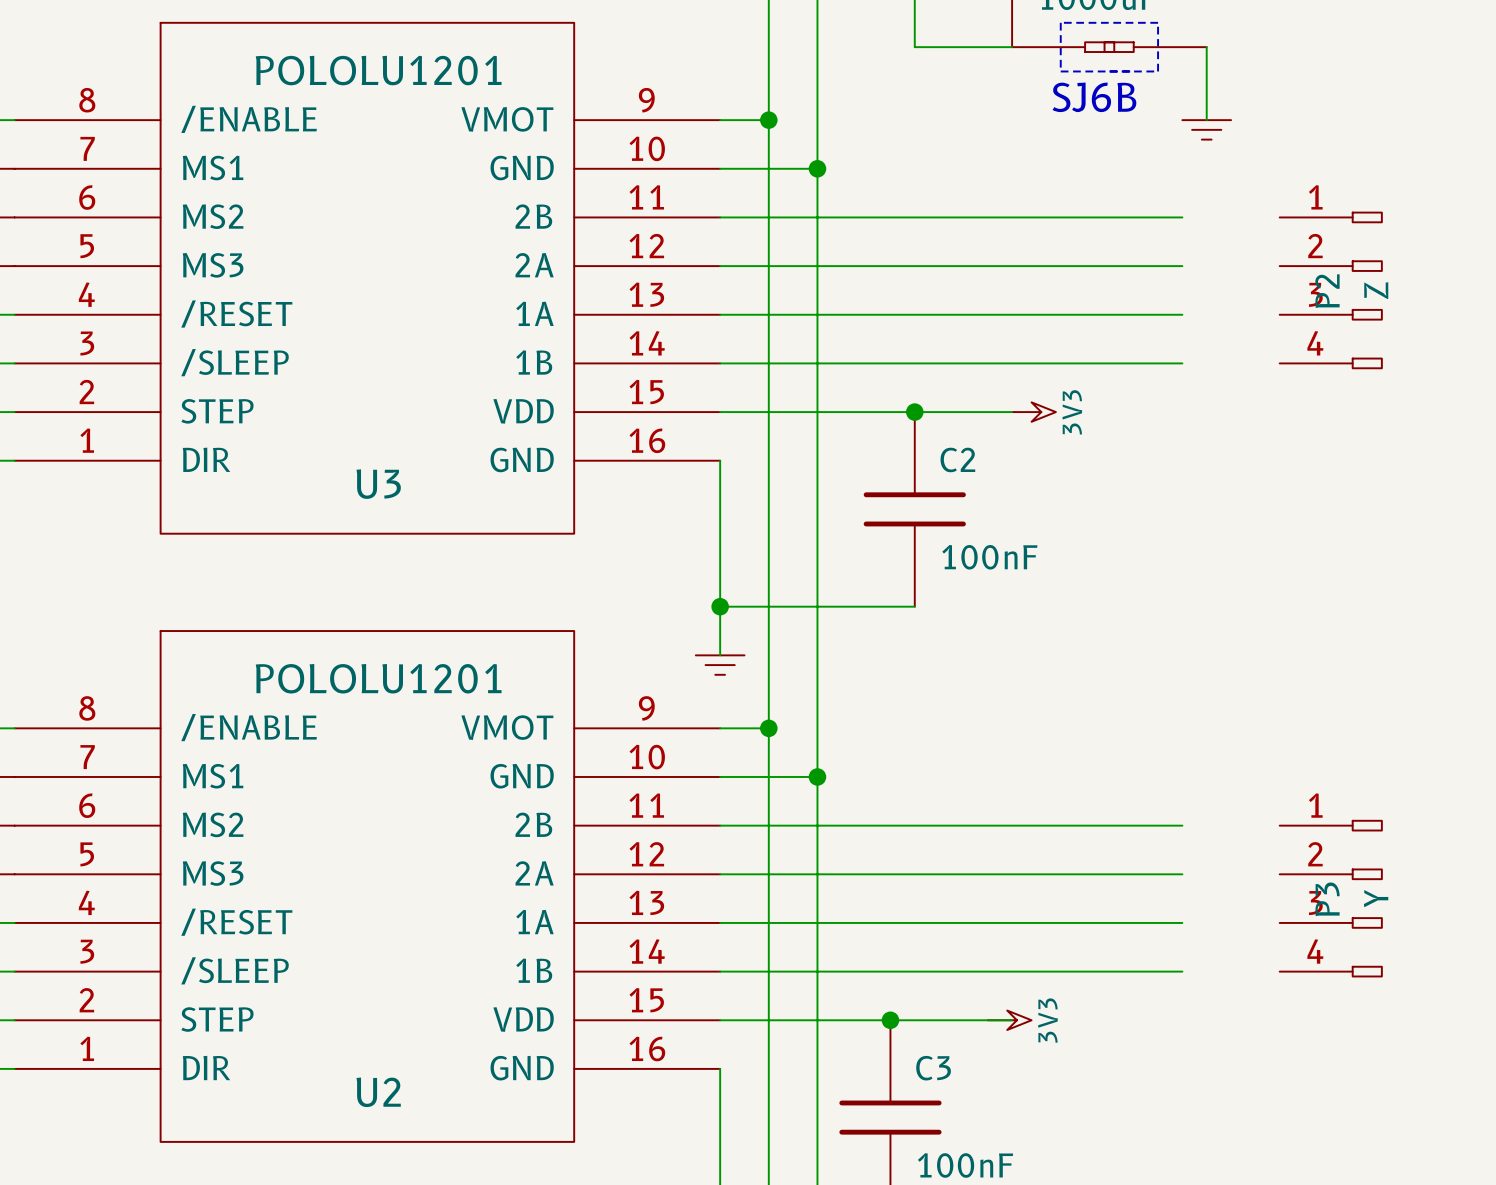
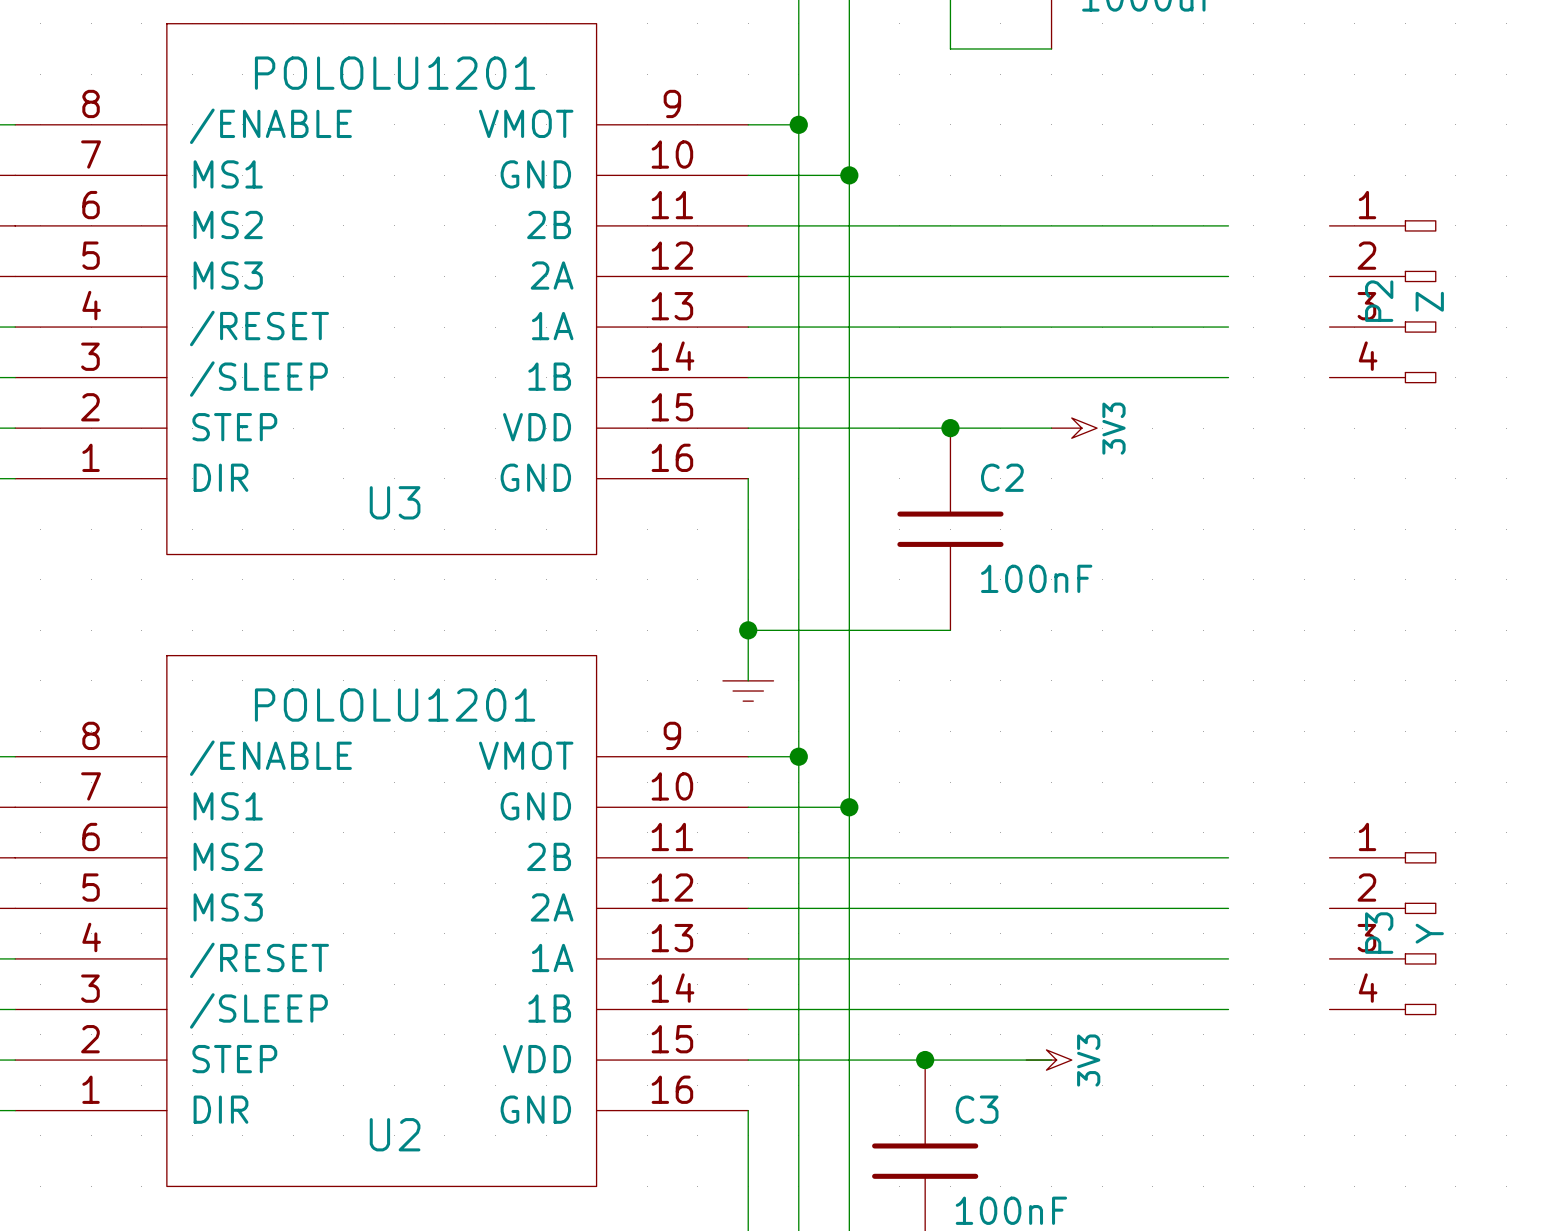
line: (1060, 22) (1158, 22) (1158, 71) (1060, 71) (1060, 22) -> none
part: (1063, 47) -> none
part: (1155, 47) -> none
wire: (1206, 47) (1206, 120) -> none
text: SJ6B (1094, 97) -> none
power symbol: (1206, 129) -> none

